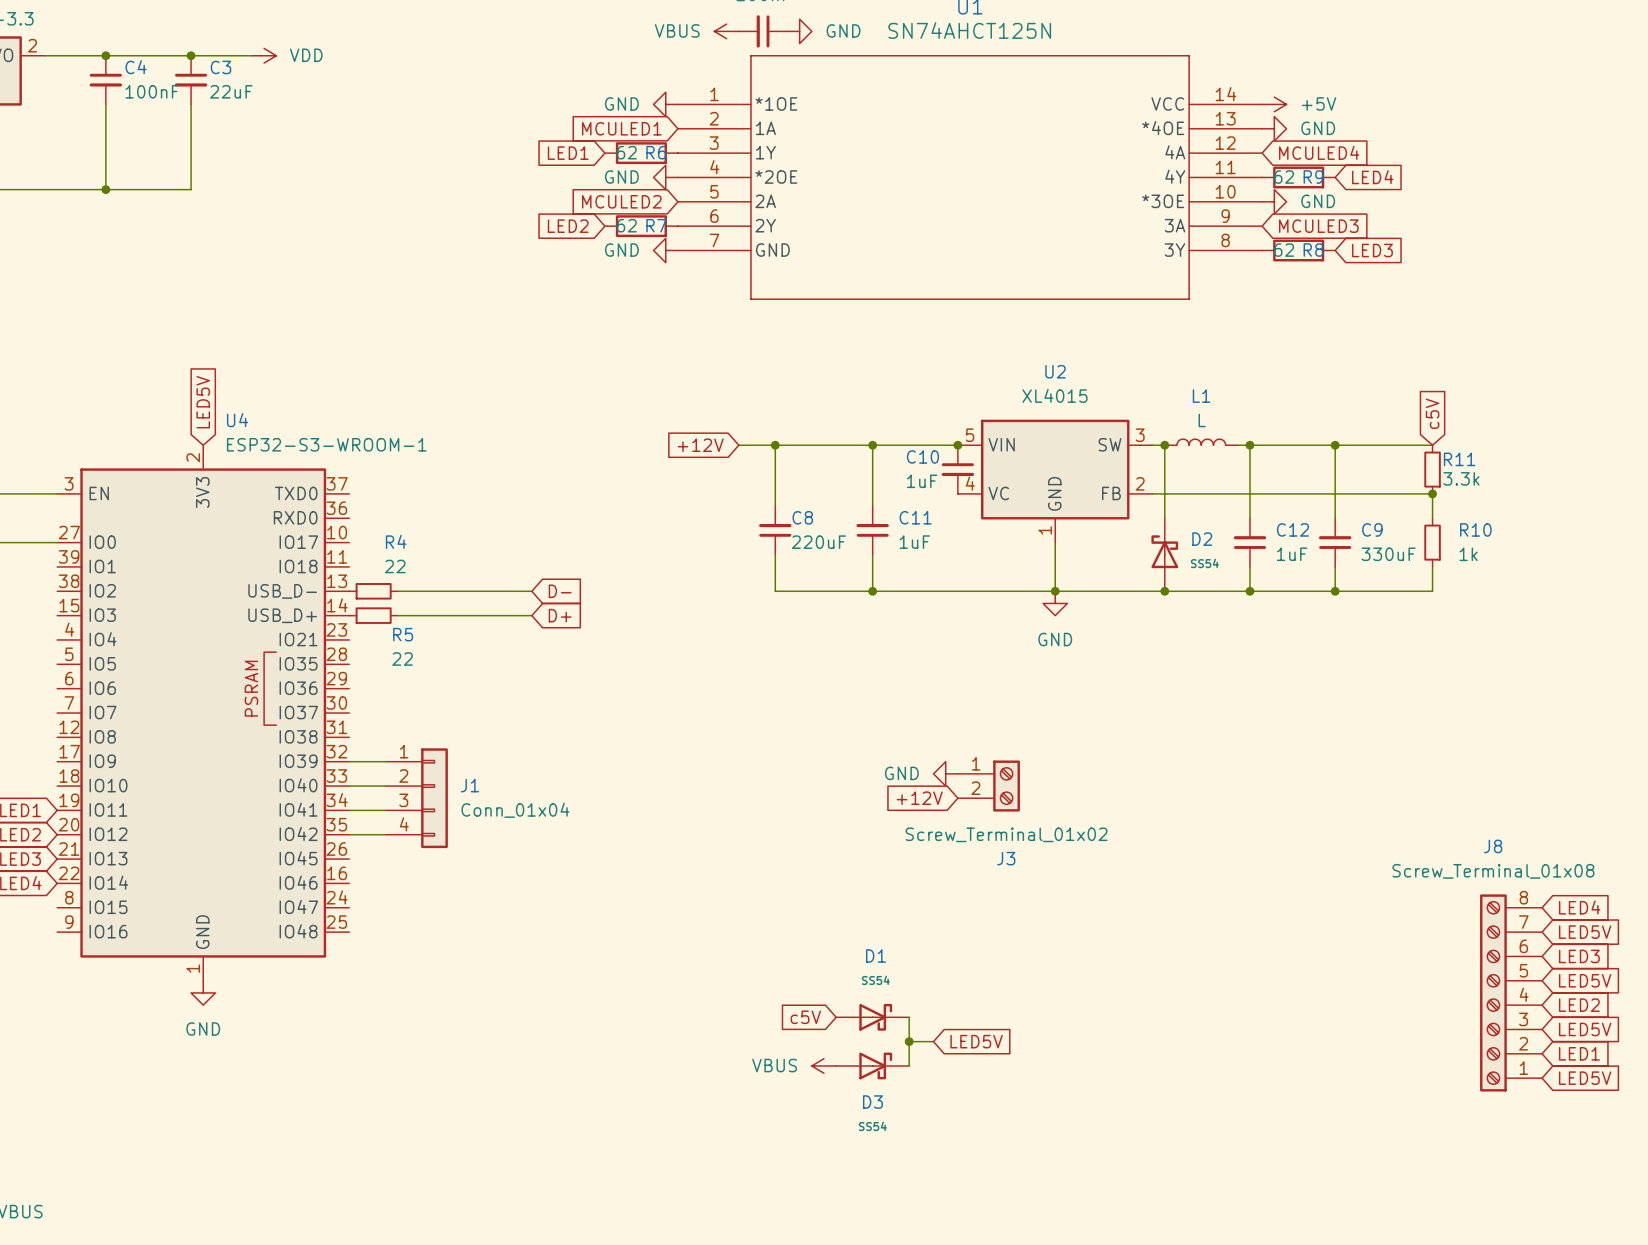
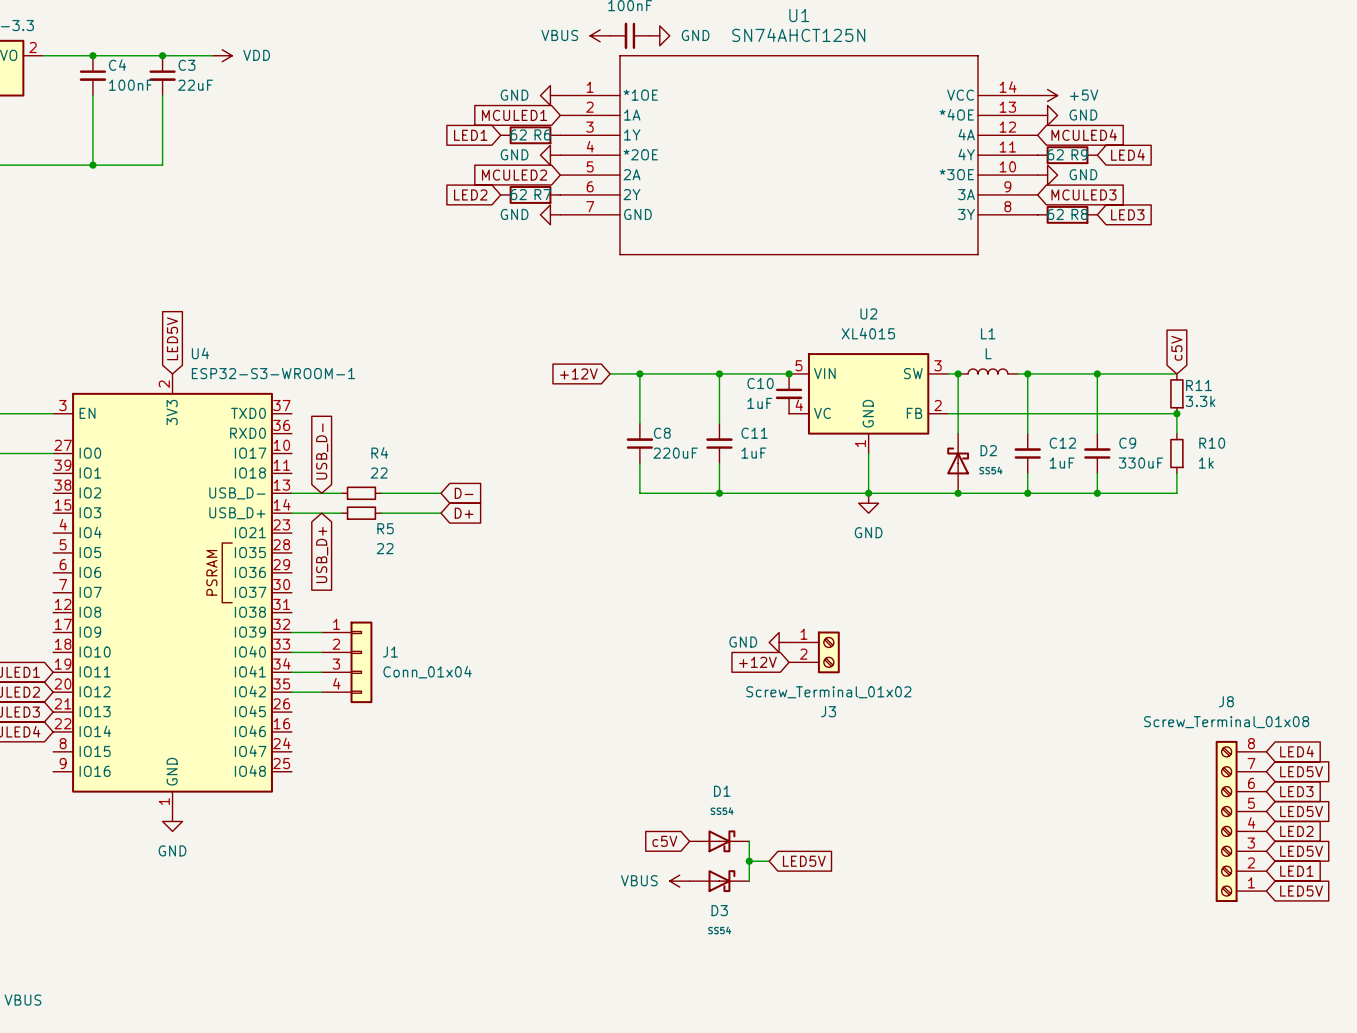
global label: none -> USB_D- (322, 451)
R4 position: (373, 591) -> (361, 493)
wire: (410, 591) (458, 591) -> (291, 493) (331, 493)
R5 position: (373, 615) -> (361, 513)
wire: (410, 615) (458, 615) -> (291, 513) (331, 513)
global label: none -> USB_D+ (322, 554)

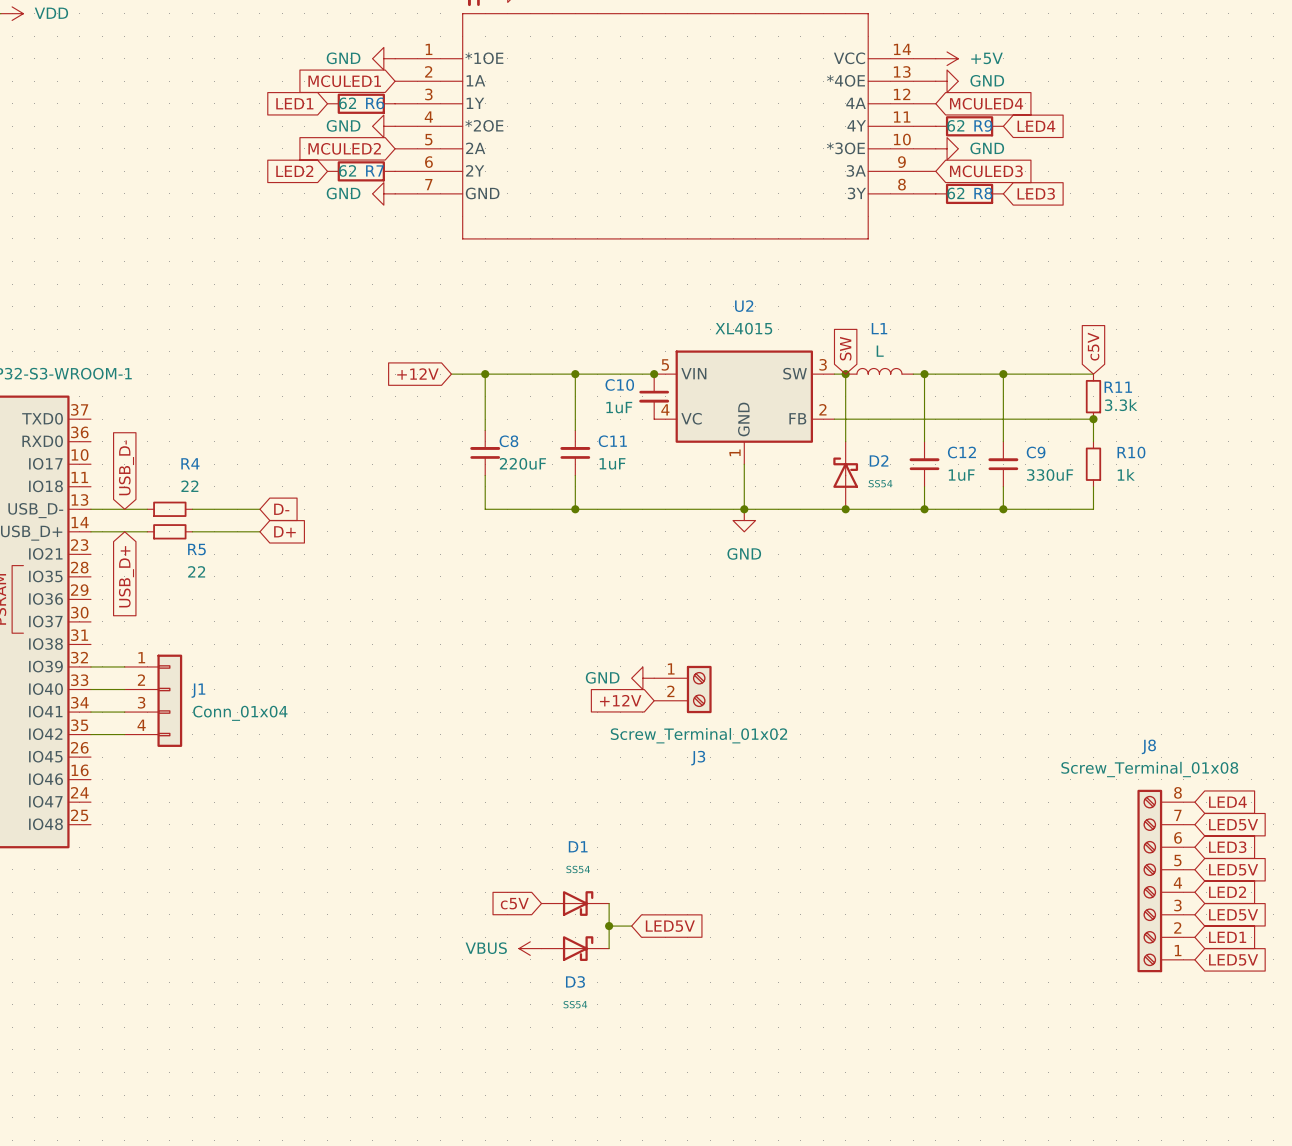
global label: none -> SW (845, 348)

